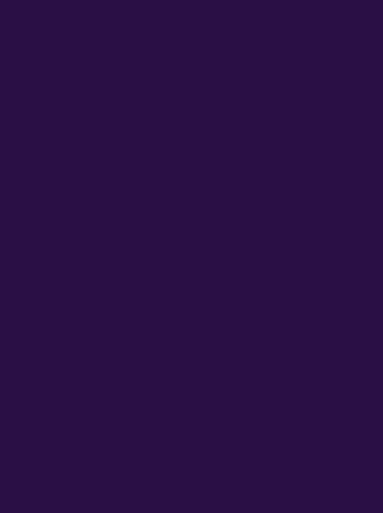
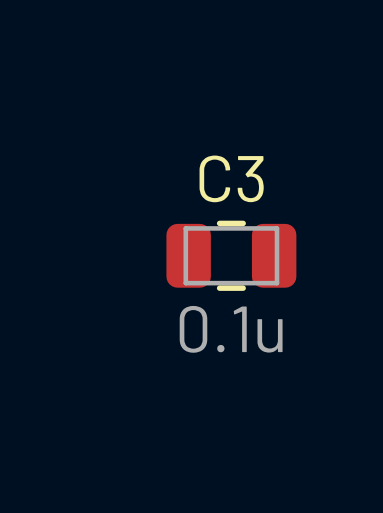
C3: none -> 0.1u (231, 255)

